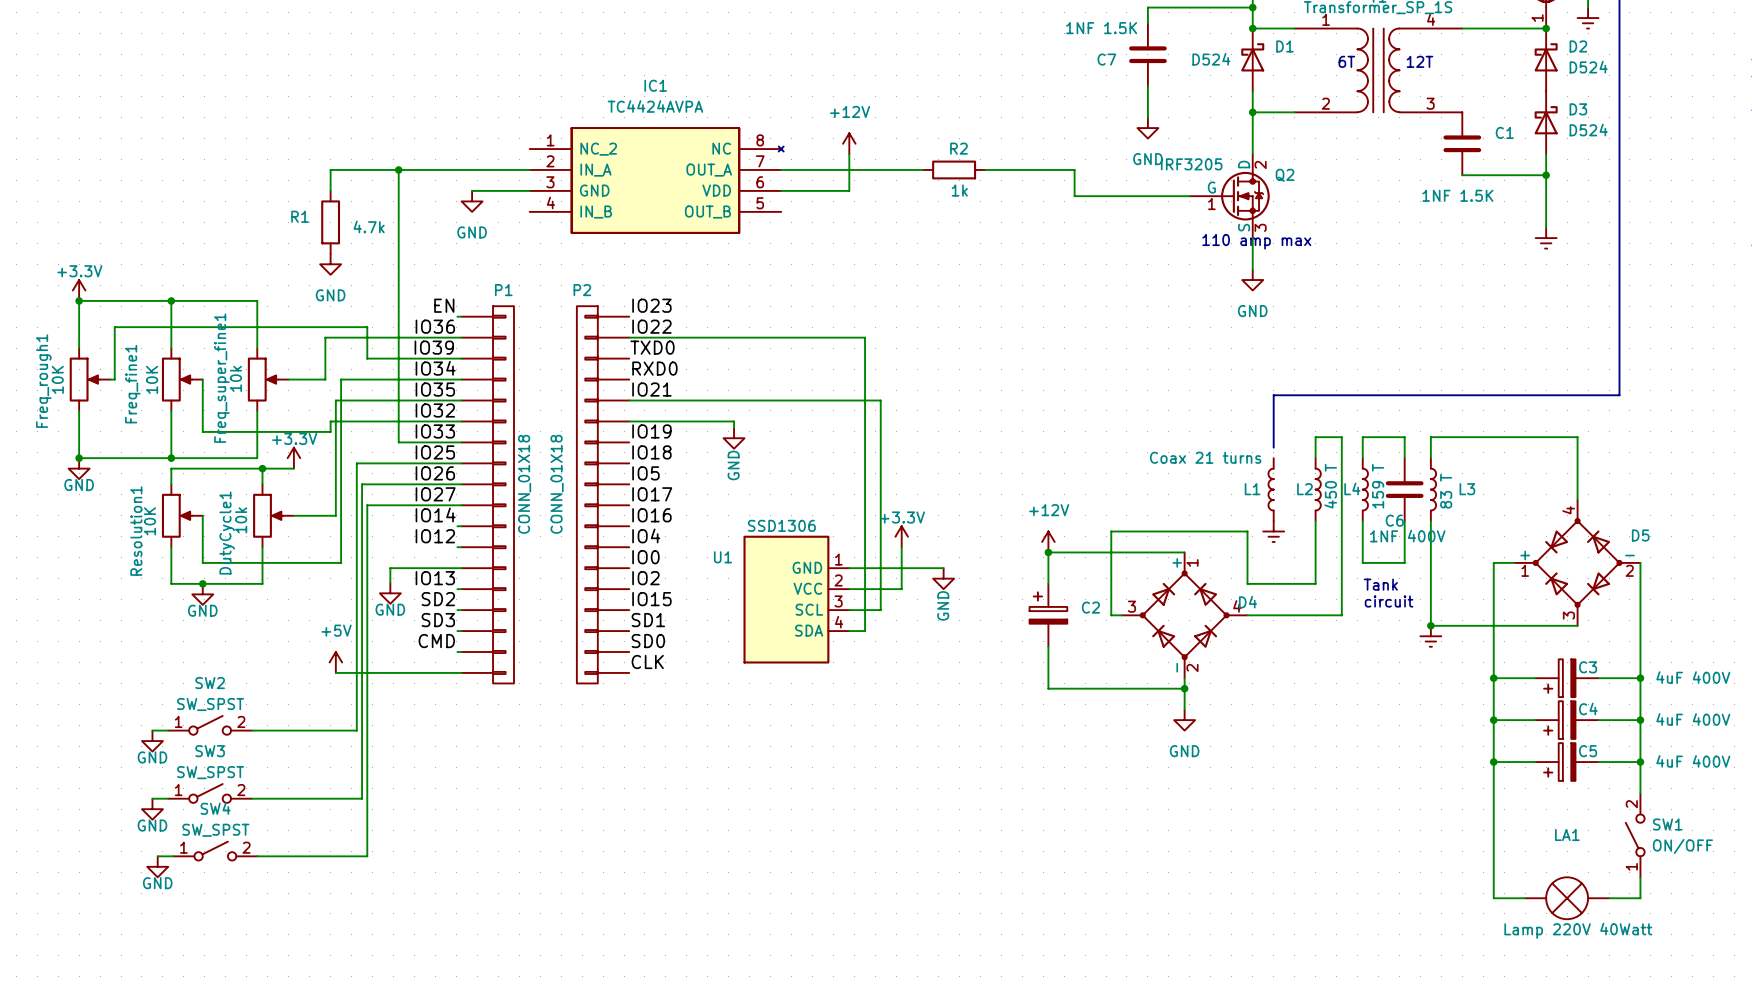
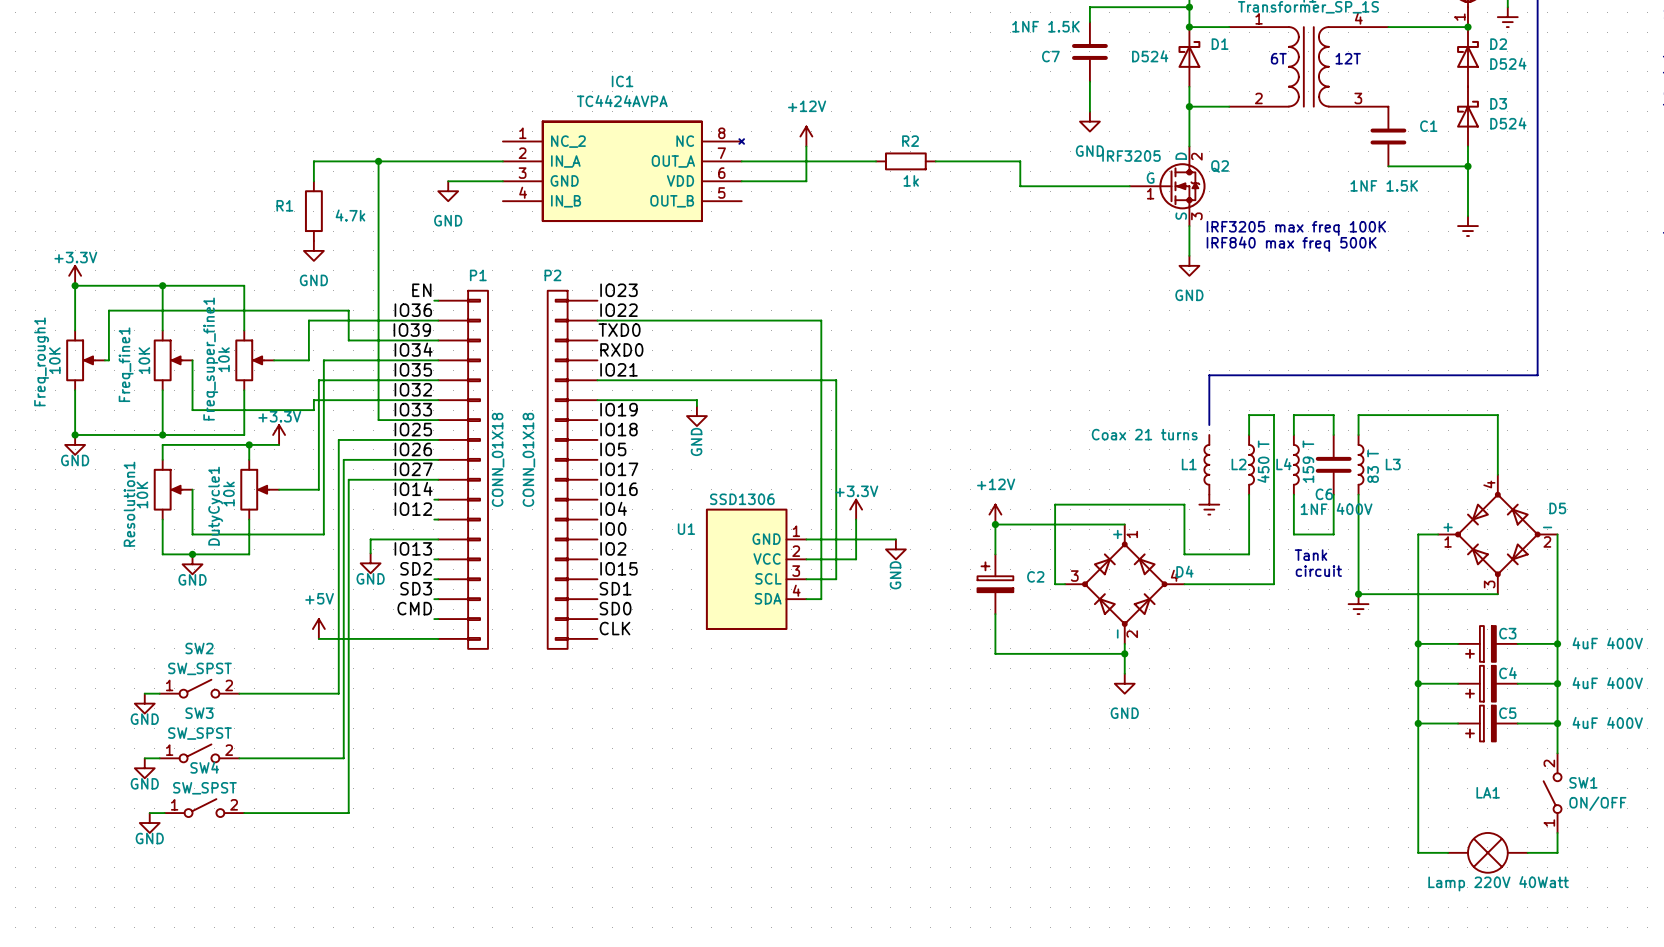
text: none -> IRF3205 max freq 100K (1296, 228)
text: 110 amp max (1256, 241) -> none
text: none -> IRF840 max freq 500K (1291, 244)

